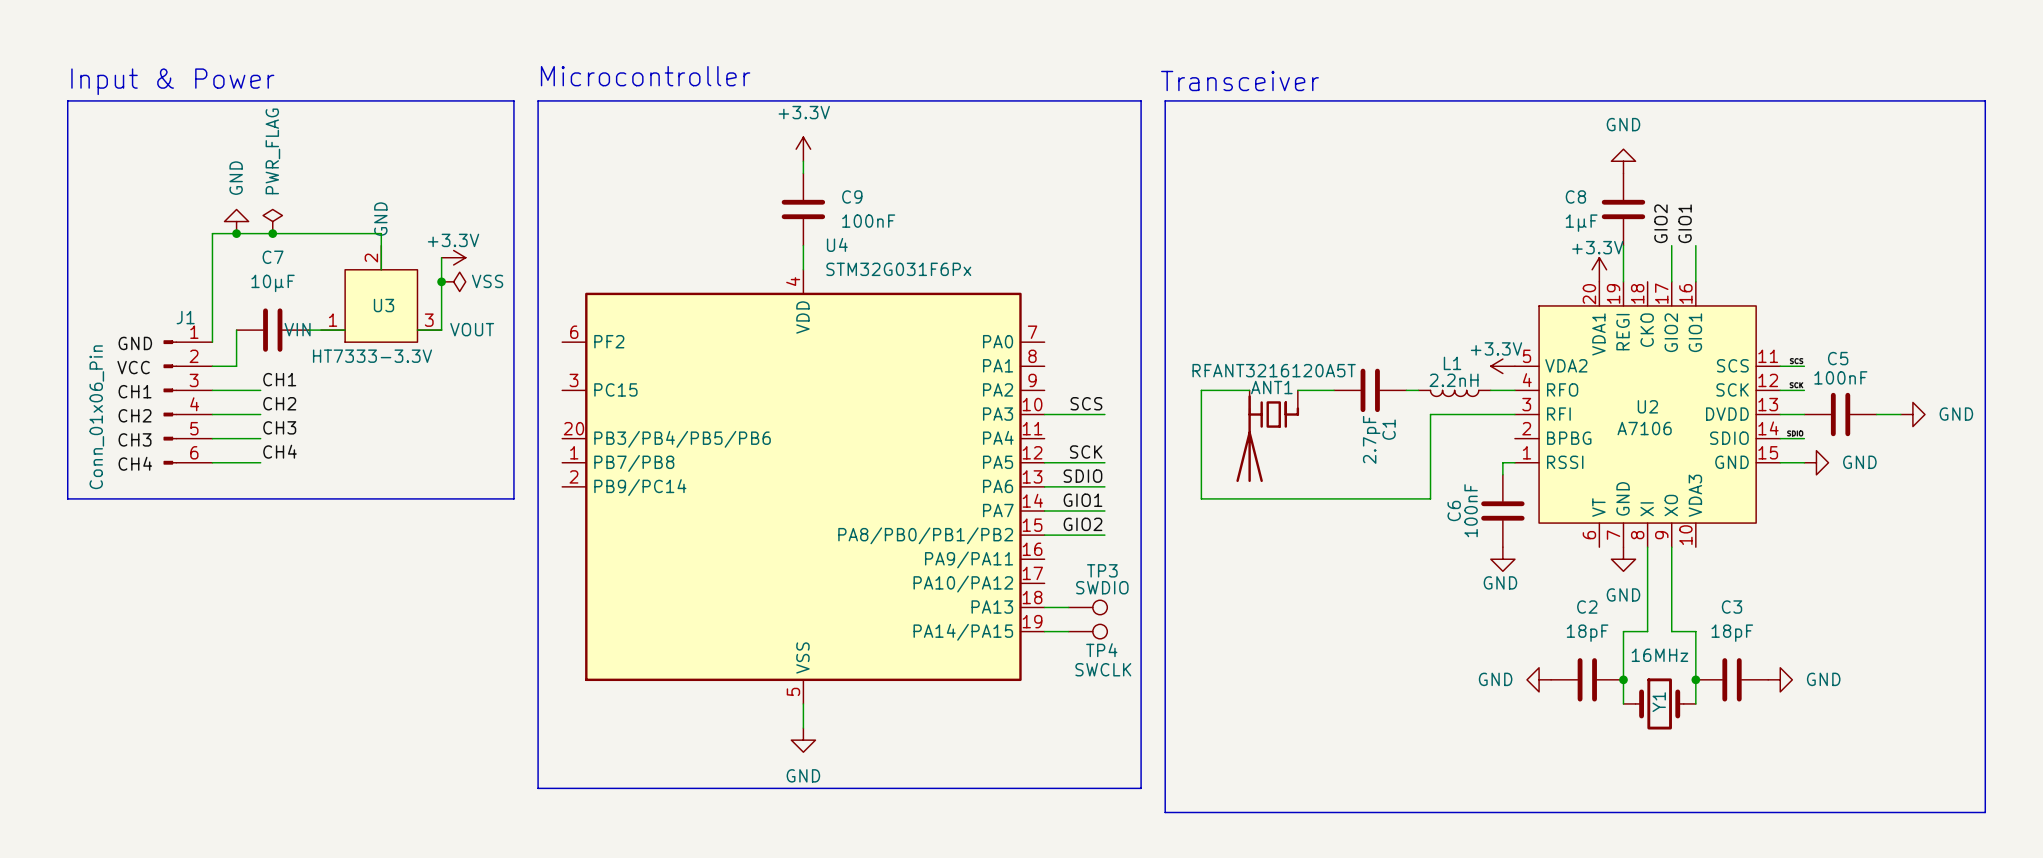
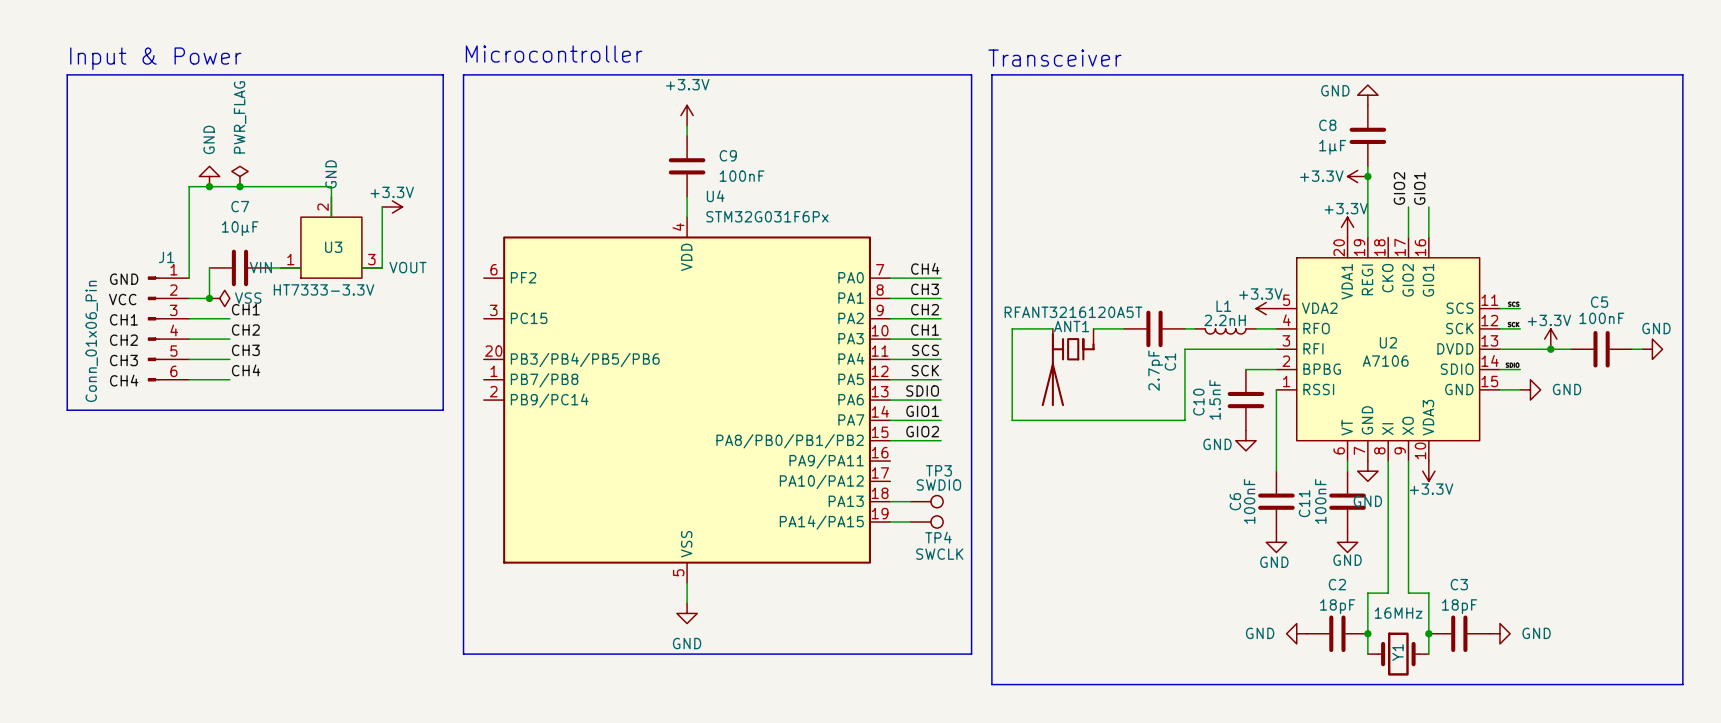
text position: Microcontroller (645, 76) -> Microcontroller (554, 54)
text position: Transceiver (1239, 80) -> Transceiver (1054, 58)
text position: Input & Power (172, 81) -> Input & Power (155, 58)
line: (67, 100) (513, 100) (513, 498) (67, 498) (67, 100) -> (67, 74) (443, 74) (443, 410) (67, 410) (67, 74)
line: (538, 100) (1141, 100) (1141, 788) (538, 788) (538, 100) -> (463, 74) (971, 74) (971, 654) (463, 654) (463, 74)
power symbol text position: GND (1623, 124) -> GND (1335, 90)
power symbol position: +3.3V (803, 149) -> +3.3V (687, 115)
wire: (803, 161) (803, 173) -> (687, 125) (687, 135)
power symbol position: GND (1623, 161) -> GND (1367, 95)
C9 position: (803, 209) -> (687, 166)
power symbol: none -> +3.3V (1357, 176)
junction: none -> (1367, 176)
C8 position: (1623, 209) -> (1367, 135)
power symbol position: GND (236, 221) -> GND (209, 176)
junction: none -> (209, 186)
power symbol position: PWR_FLAG (272, 221) -> PWR_FLAG (239, 176)
junction: none -> (239, 186)
junction: (236, 233) -> none
junction: (272, 233) -> none
wire: (803, 245) (803, 269) -> (687, 196) (687, 217)
wire: (441, 257) (441, 330) (417, 330) -> (382, 206) (382, 267) (361, 267)
power symbol position: +3.3V (453, 257) -> +3.3V (392, 206)
wire: (381, 269) (381, 233) (212, 233) (212, 342) -> (331, 217) (331, 186) (189, 186) (189, 278)
junction: (441, 281) -> none
power symbol position: VSS (453, 281) -> VSS (219, 298)
U3 position: (381, 294) -> (331, 237)
label: none -> CH4 (925, 268)
wire: (236, 330) (236, 366) (212, 366) -> (209, 267) (209, 298) (189, 298)
C7 position: (272, 330) -> (239, 267)
wire: (308, 330) (345, 330) -> (270, 267) (300, 267)
wire: none -> (890, 278) (941, 278)
label position: GND (135, 343) -> GND (124, 279)
label: none -> CH3 (925, 289)
junction: none -> (209, 298)
wire: none -> (890, 298) (941, 298)
label position: VCC (133, 367) -> VCC (122, 299)
label: none -> CH2 (925, 309)
wire: none -> (890, 318) (941, 318)
label position: CH1 (279, 379) -> CH1 (245, 309)
wire: (212, 390) (260, 390) -> (189, 318) (229, 318)
label position: CH1 (135, 391) -> CH1 (123, 319)
label: none -> CH1 (925, 330)
J1 position: (187, 402) -> (168, 328)
power symbol: none -> +3.3V (1550, 339)
label position: CH2 (279, 403) -> CH2 (245, 330)
label position: SCS (1086, 403) -> SCS (925, 350)
wire: (212, 414) (260, 414) -> (189, 339) (229, 339)
wire: (1044, 414) (1104, 414) -> (890, 339) (941, 339)
wire: (1430, 414) (1430, 498) (1406, 498) -> (1205, 349) (1184, 349) (1184, 420)
junction: none -> (1550, 349)
C5 position: (1840, 414) -> (1601, 349)
power symbol position: GND (1912, 414) -> GND (1652, 349)
wire: none -> (1632, 349) (1642, 349)
power symbol text position: GND (1956, 414) -> GND (1656, 328)
label position: CH2 (135, 415) -> CH2 (123, 340)
wire: none -> (890, 359) (941, 359)
label position: CH3 (279, 427) -> CH3 (245, 350)
wire: (212, 438) (260, 438) -> (189, 359) (229, 359)
wire: none -> (1245, 369) (1276, 369)
label position: CH3 (135, 439) -> CH3 (123, 360)
label position: CH4 (280, 451) -> CH4 (246, 370)
label position: SCK (1086, 451) -> SCK (925, 370)
wire: (212, 462) (260, 462) -> (189, 379) (229, 379)
wire: (1044, 462) (1104, 462) -> (890, 379) (941, 379)
wire: (1514, 462) (1502, 462) (1502, 474) -> (1276, 389) (1276, 471)
label position: CH4 (135, 463) -> CH4 (124, 380)
C10: none -> 1.5nF (1245, 400)
label position: SDIO (1082, 476) -> SDIO (922, 390)
U4 position: (803, 486) -> (687, 400)
wire: (1044, 486) (1104, 486) -> (890, 400) (941, 400)
label position: GIO1 (1082, 500) -> GIO1 (922, 411)
wire: (1044, 510) (1104, 510) -> (890, 420) (941, 420)
C6 position: (1502, 510) -> (1276, 501)
power symbol: none -> GND (1245, 440)
label position: GIO2 (1082, 524) -> GIO2 (922, 431)
wire: (1044, 535) (1104, 535) -> (890, 440) (941, 440)
wire: none -> (1347, 461) (1347, 471)
power symbol: GND (1502, 559) -> none
power symbol: none -> +3.3V (1428, 471)
C11: none -> 100nF (1347, 501)
wire: (1044, 607) (1068, 607) -> (890, 501) (910, 501)
TP3 position: (1088, 607) -> (926, 501)
C2 name position: C2 (1587, 607) -> C2 (1337, 584)
C3 name position: C3 (1732, 607) -> C3 (1459, 584)
wire: (1044, 631) (1068, 631) -> (890, 521) (910, 521)
TP4 position: (1088, 631) -> (926, 521)
wire: (1647, 631) (1623, 631) (1623, 703) -> (1388, 532) (1388, 593) (1367, 593) (1367, 654)
wire: (1671, 631) (1695, 631) (1695, 703) -> (1408, 532) (1408, 593) (1428, 593) (1428, 654)
C2 value position: 18pF (1587, 633) -> 18pF (1337, 606)
C3 value position: 18pF (1732, 633) -> 18pF (1459, 606)
power symbol: none -> GND (1276, 542)
power symbol: none -> GND (1347, 542)
power symbol: GND (1539, 679) -> none
C2 position: (1587, 679) -> (1337, 633)
junction: (1623, 679) -> none
junction: (1695, 679) -> none
C3 position: (1732, 679) -> (1459, 633)
power symbol position: GND (1780, 679) -> GND (1499, 633)
wire: (803, 703) (803, 728) -> (687, 582) (687, 603)
Y1 position: (1659, 703) -> (1398, 654)
power symbol position: GND (803, 740) -> GND (687, 613)
power symbol: none -> GND (1296, 633)
junction: none -> (1367, 633)
junction: none -> (1428, 633)
line: (1177, 812) (1165, 812) (1165, 100) (1985, 100) (1985, 812) -> (991, 684) (991, 74) (1682, 74) (1682, 684) (1672, 684)

